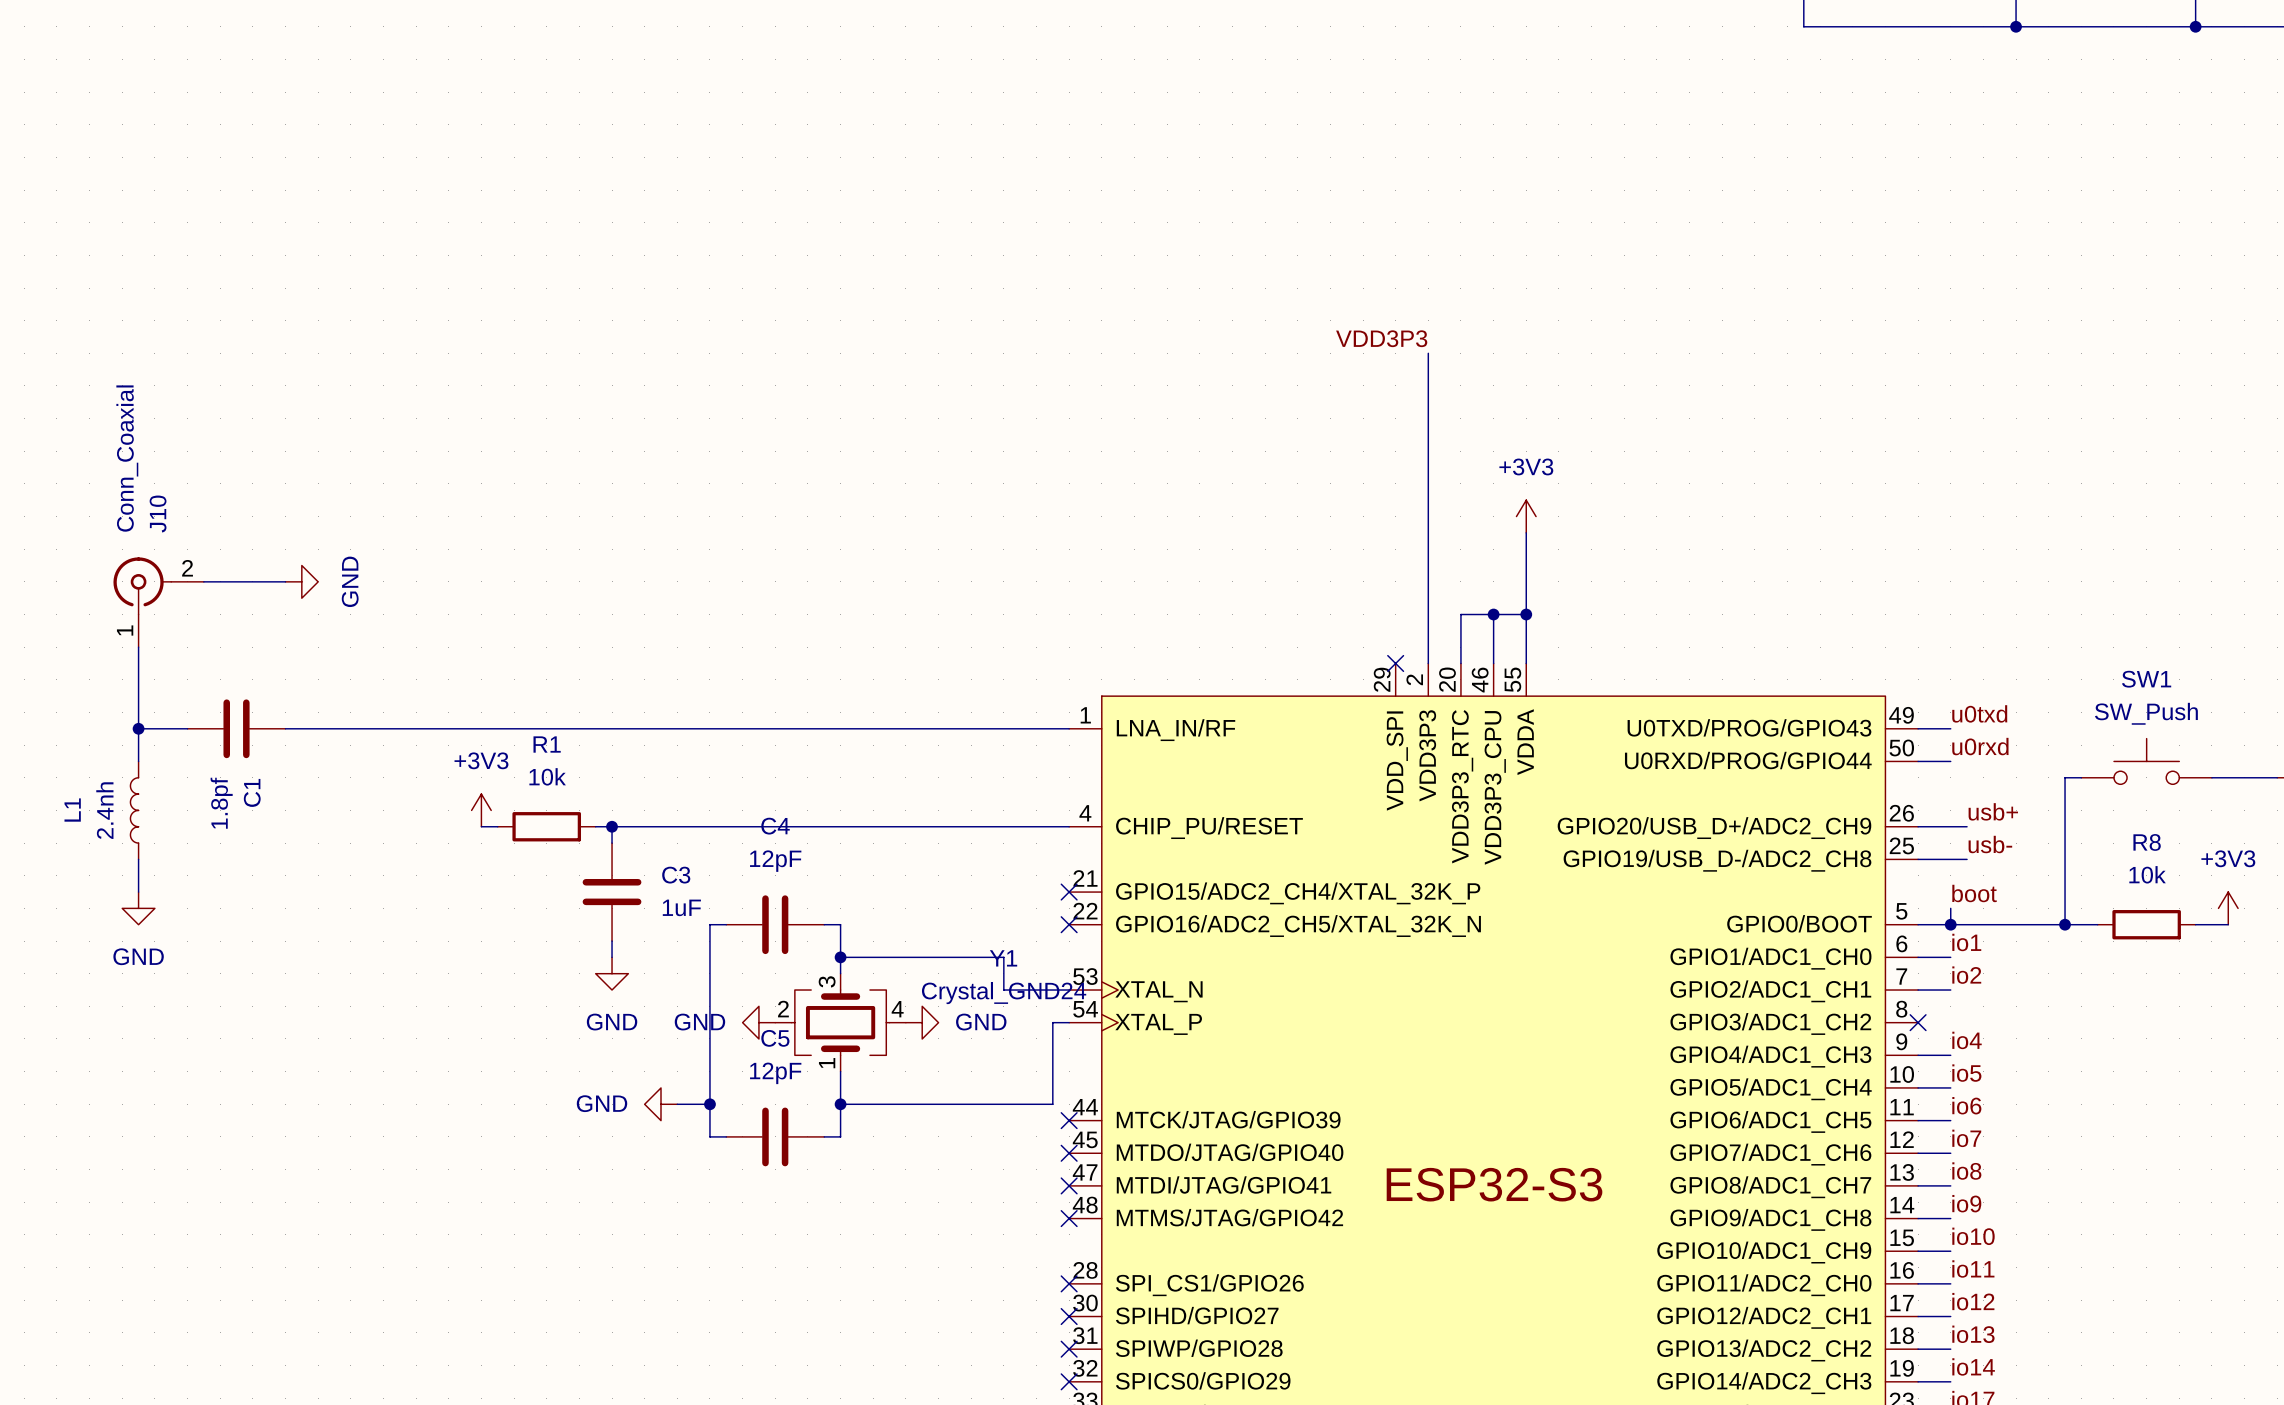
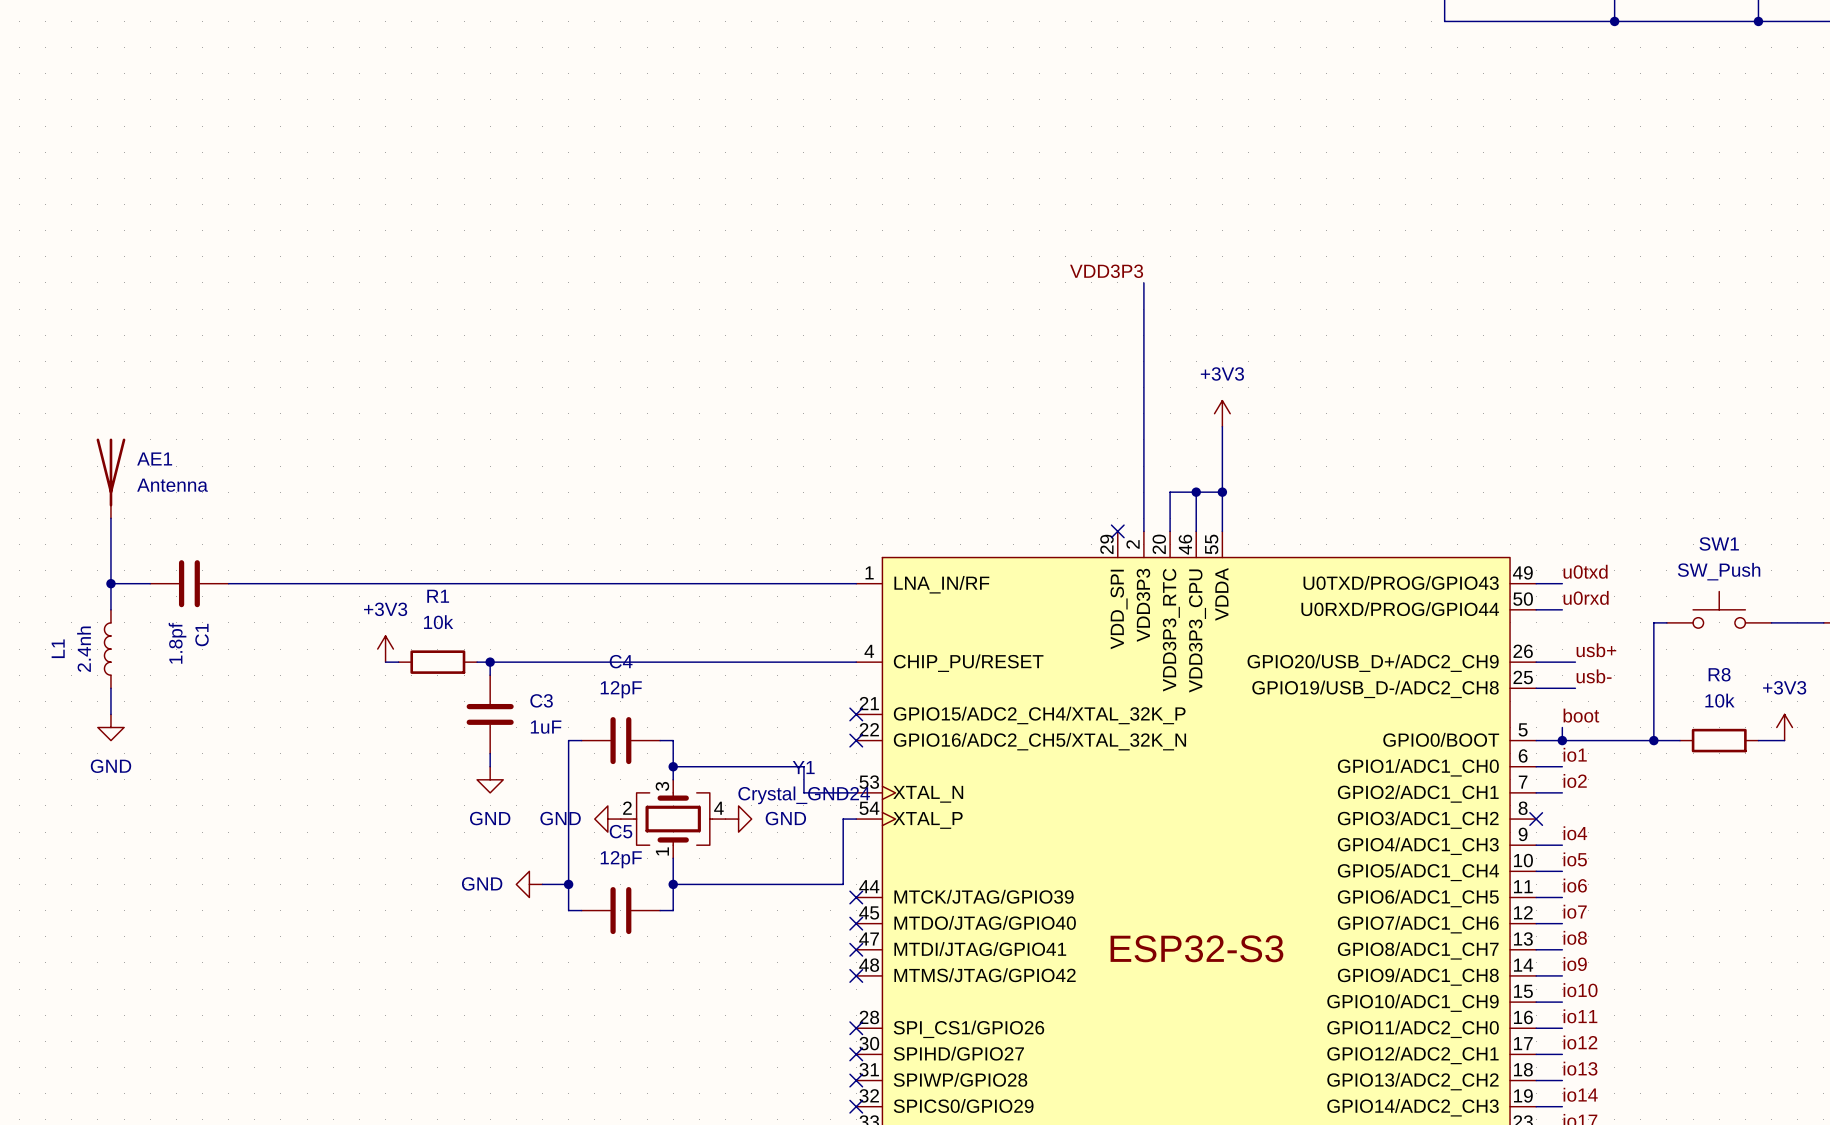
wire: (203, 581) (285, 581) -> none
power symbol: GND (301, 581) -> none
AE1: none -> Antenna (110, 478)
J10: Conn_Coaxial (158, 602) -> none

